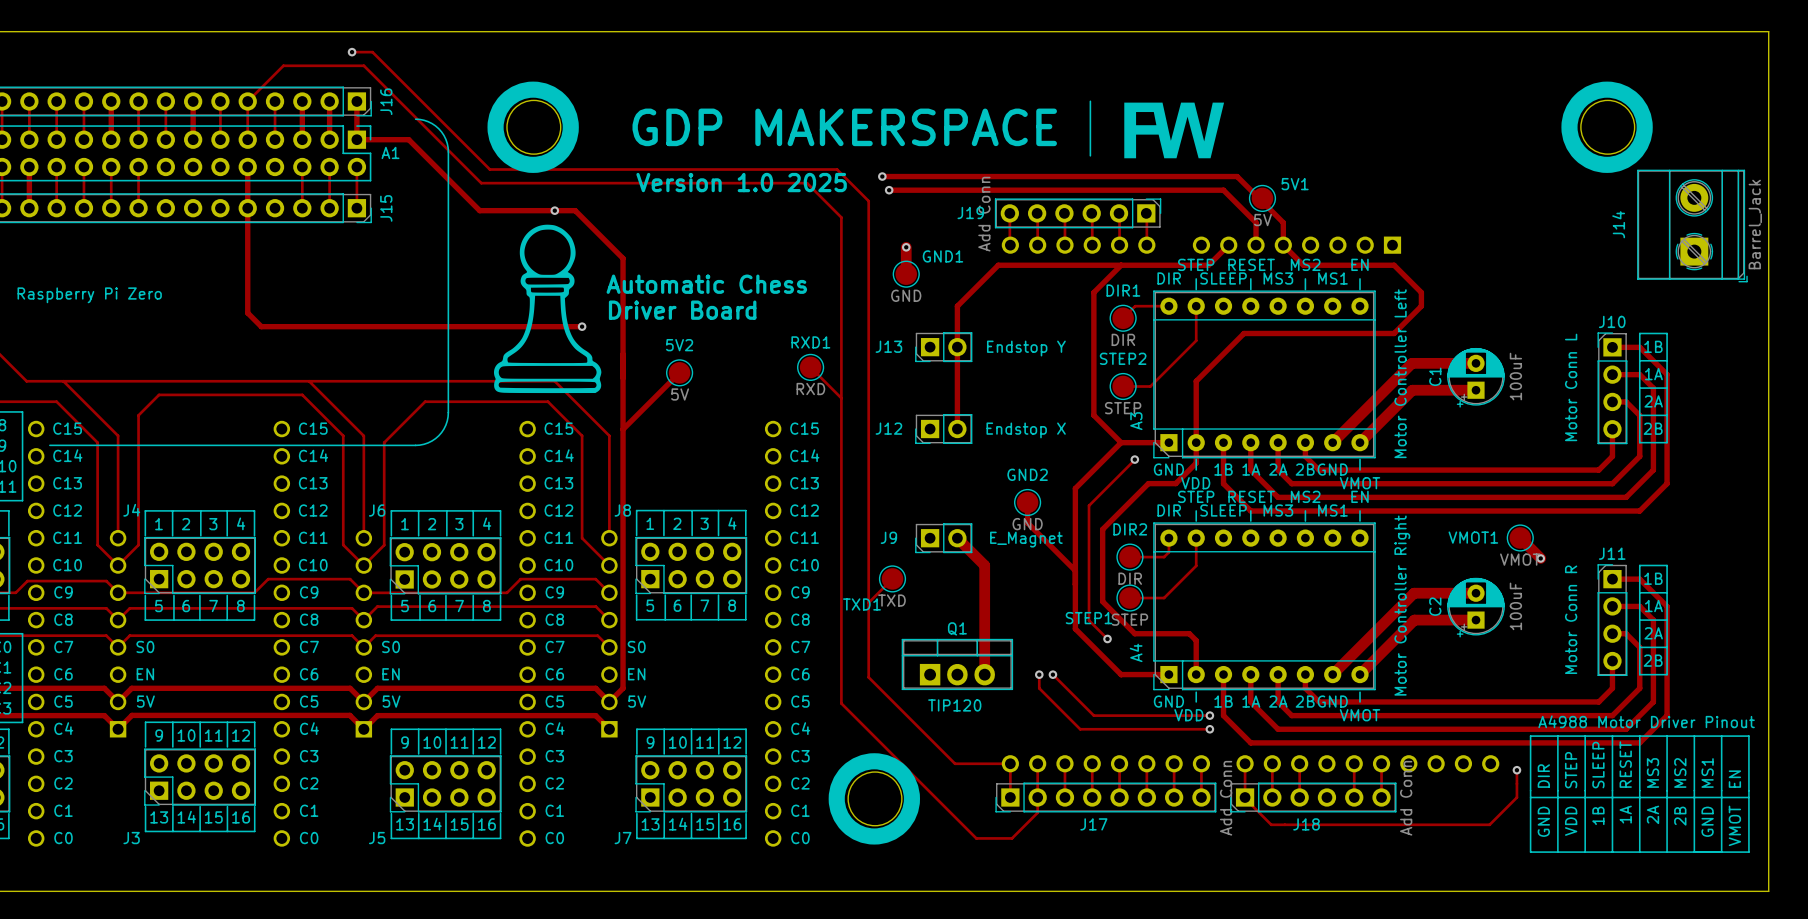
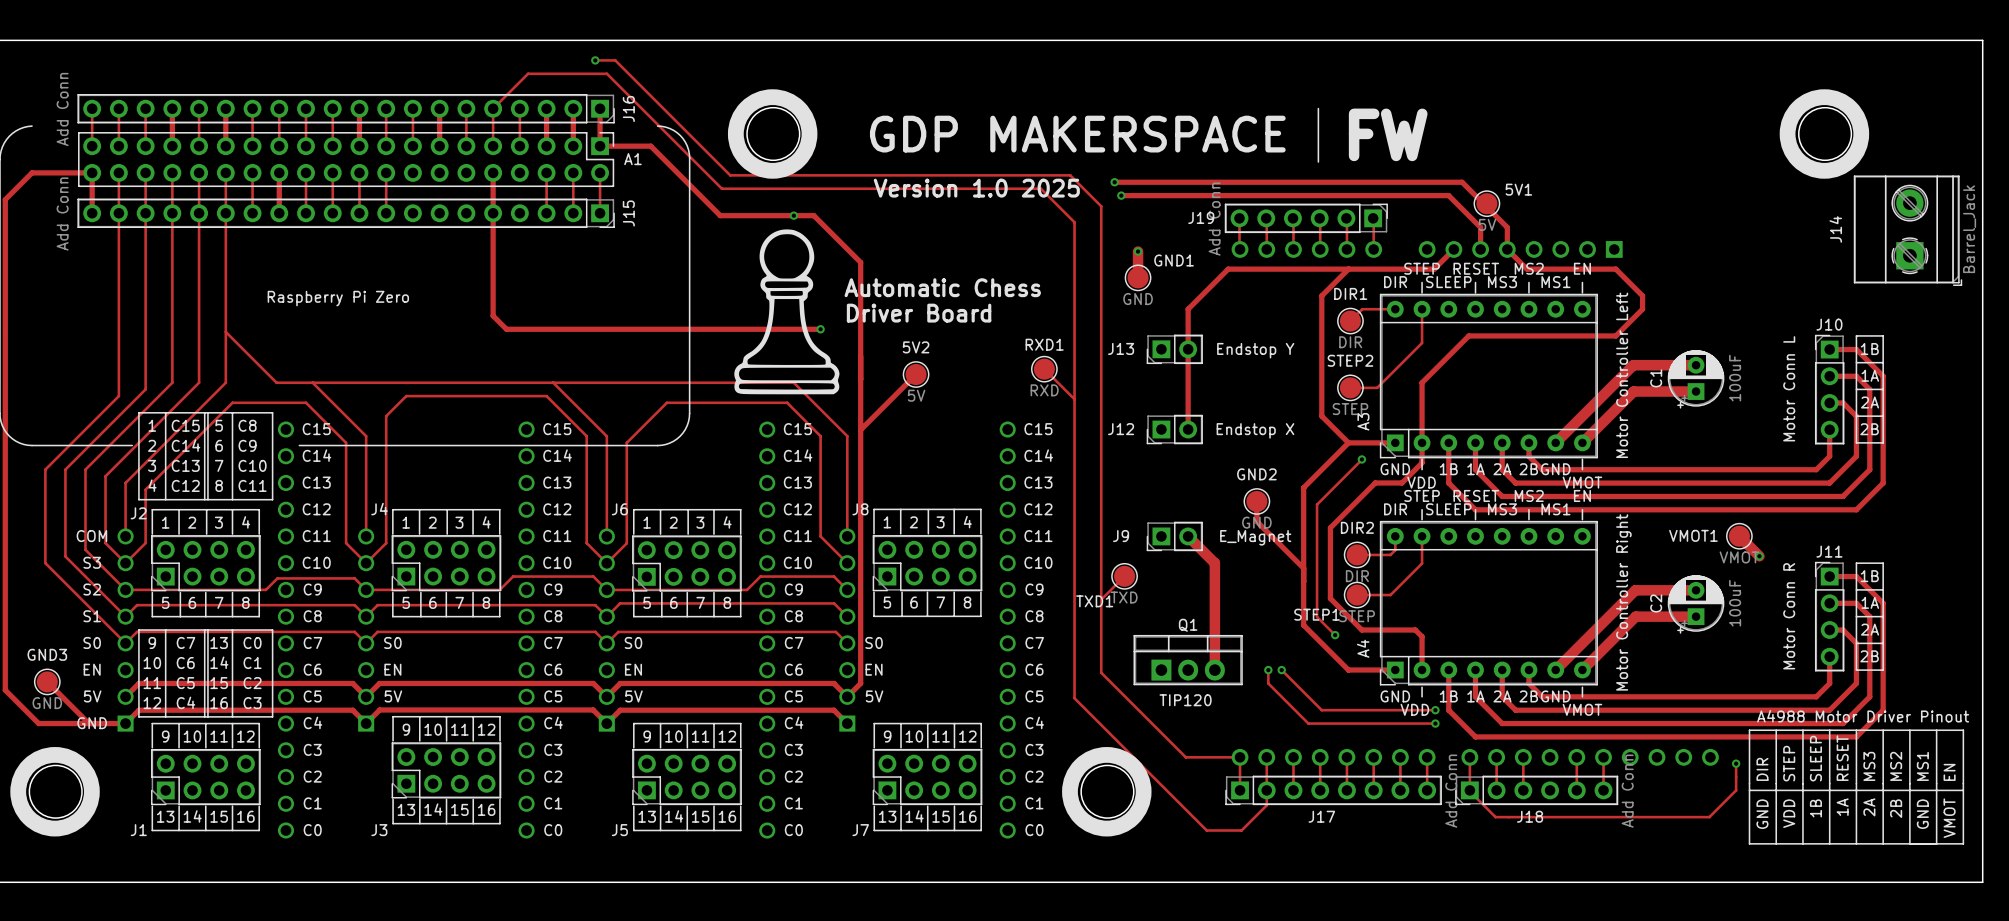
drawing: [1124, 102, 1225, 159] -> none
text: none -> FW (1388, 134)

